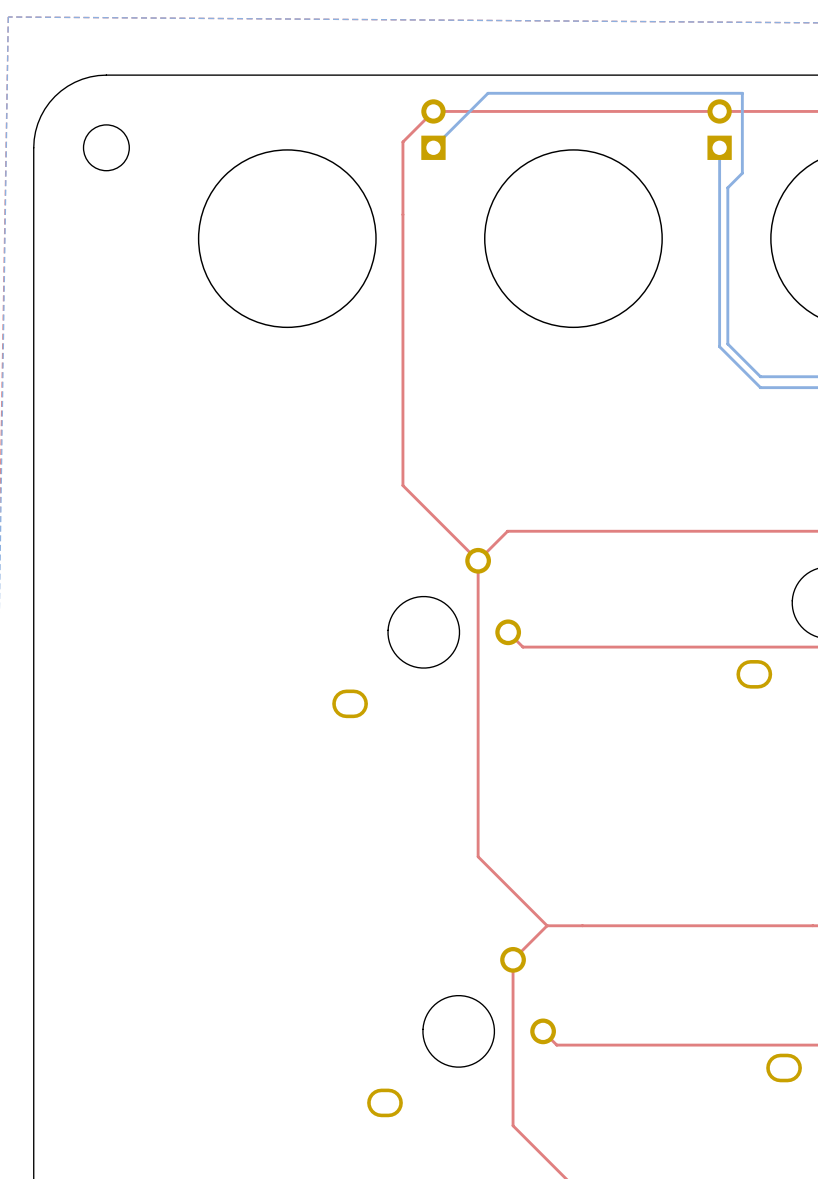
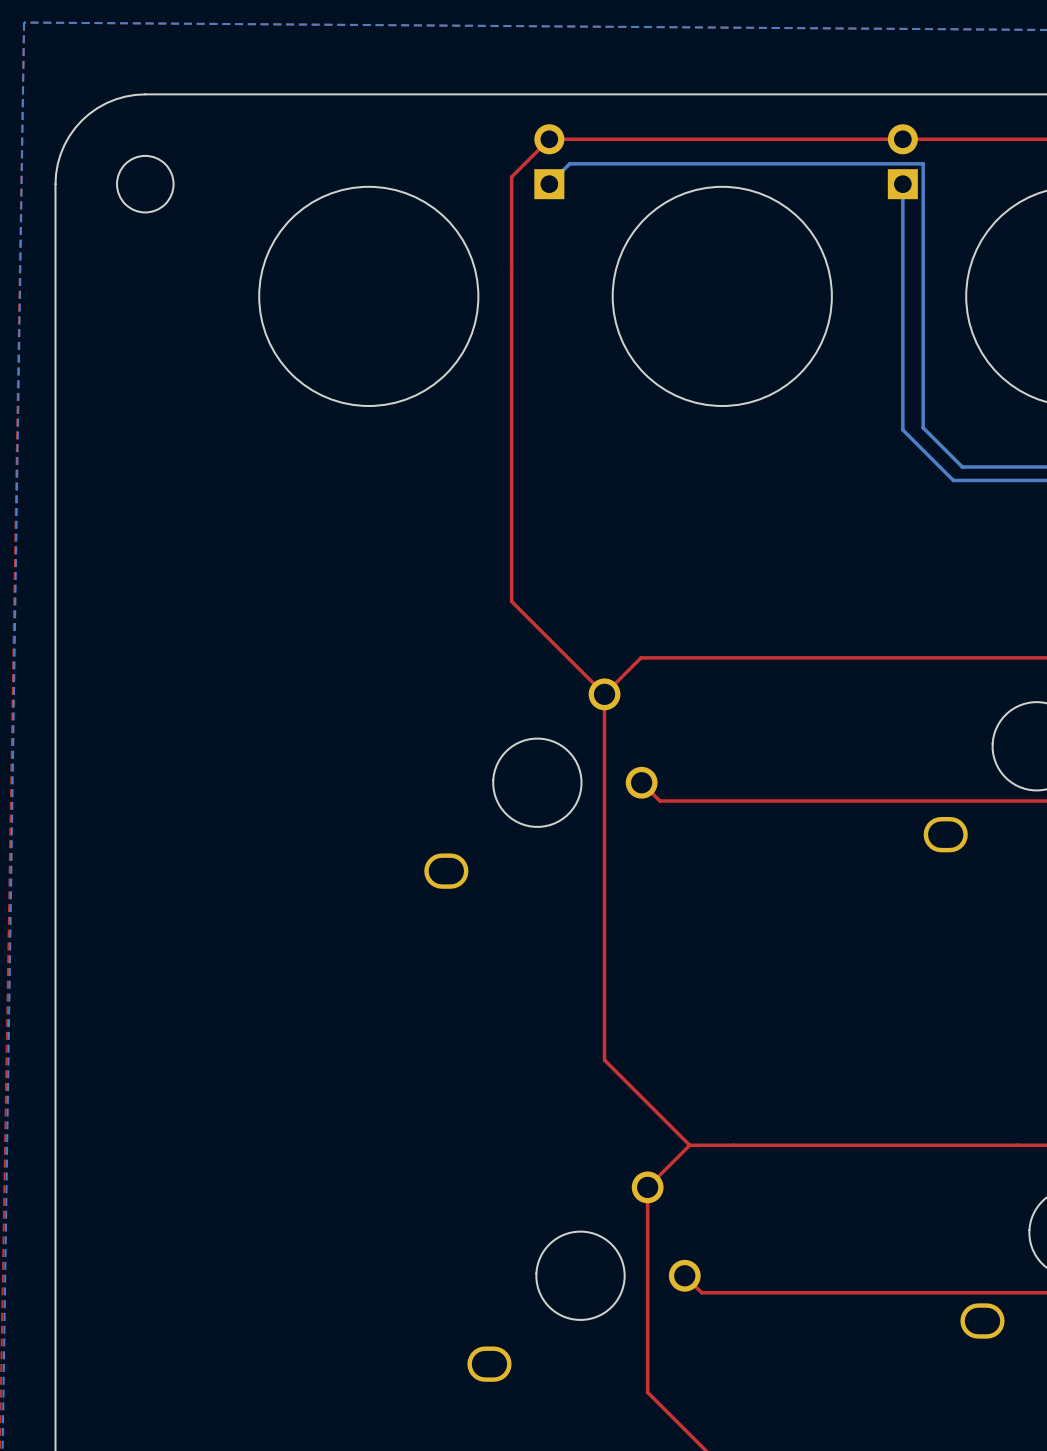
bottom track: (449, 131) (487, 93) (742, 93) (742, 173) (727, 187) (727, 344) (760, 376) (767, 376) -> (569, 163) (923, 163) (923, 427) (962, 467)

